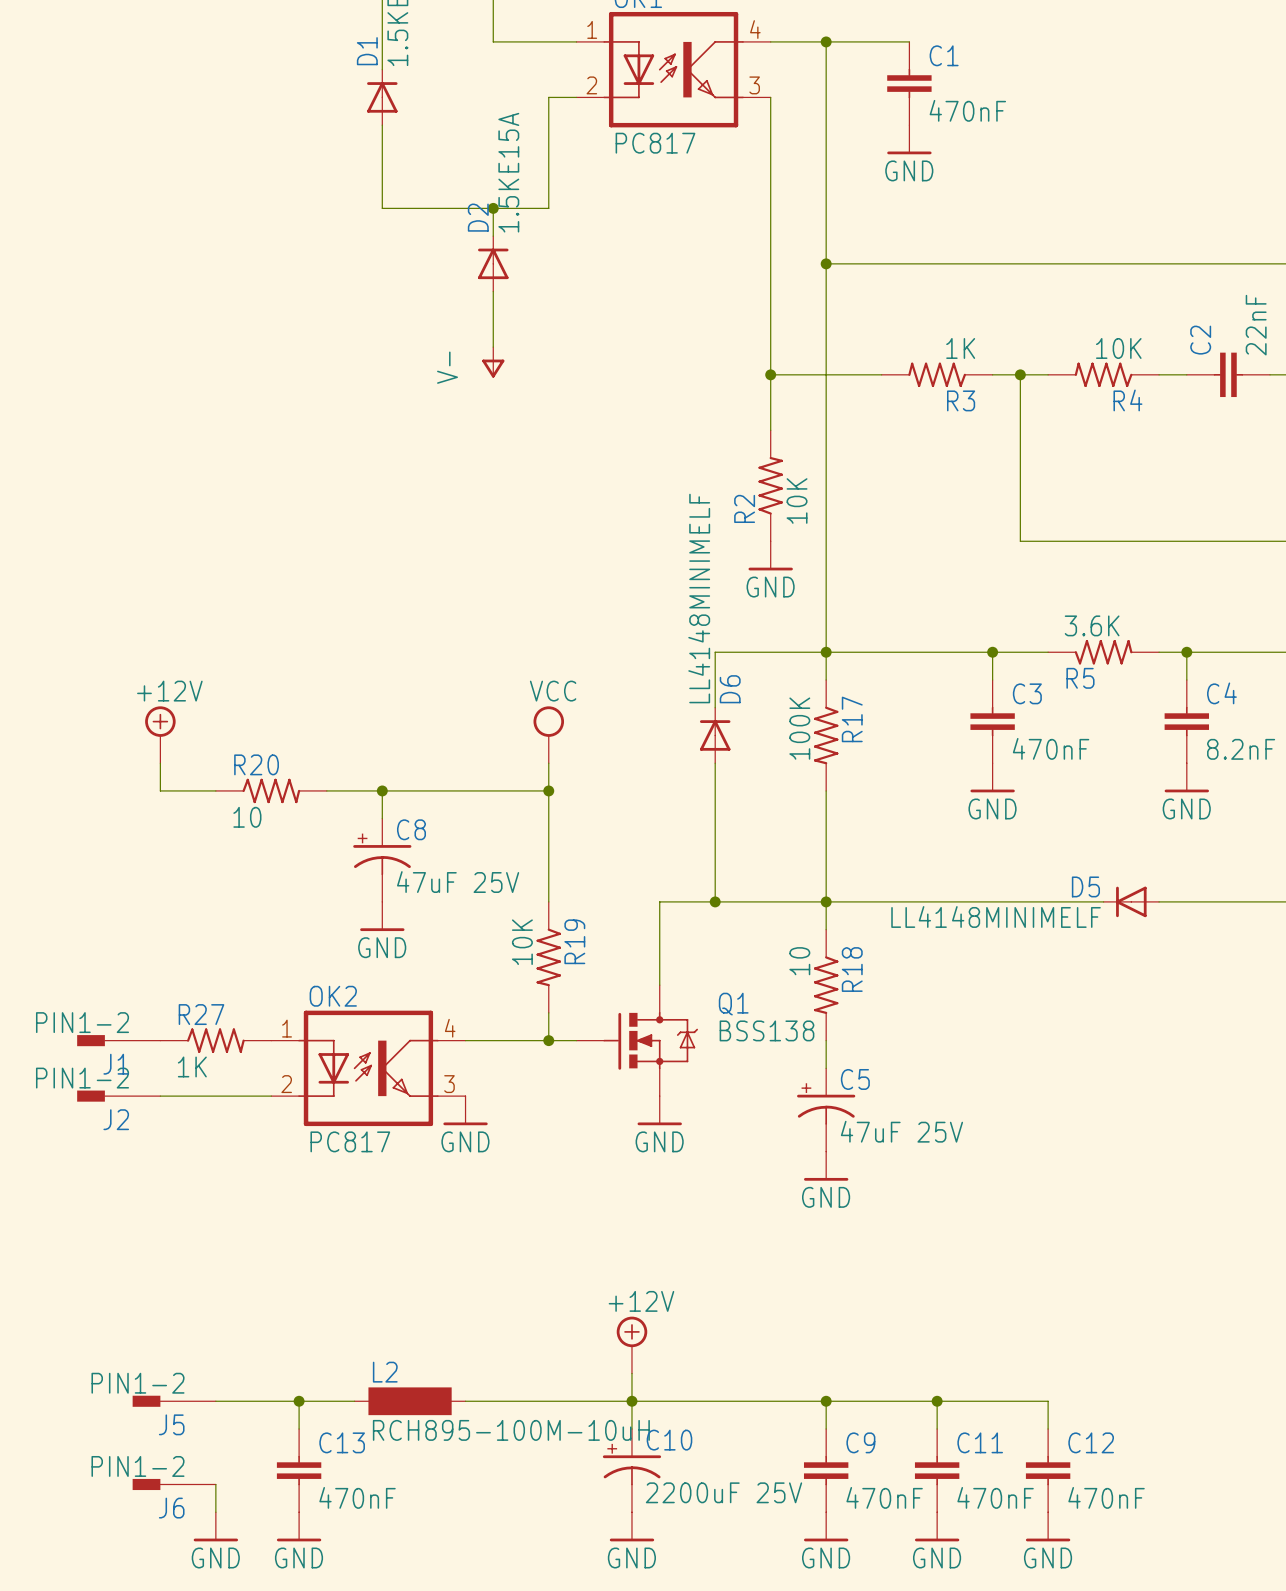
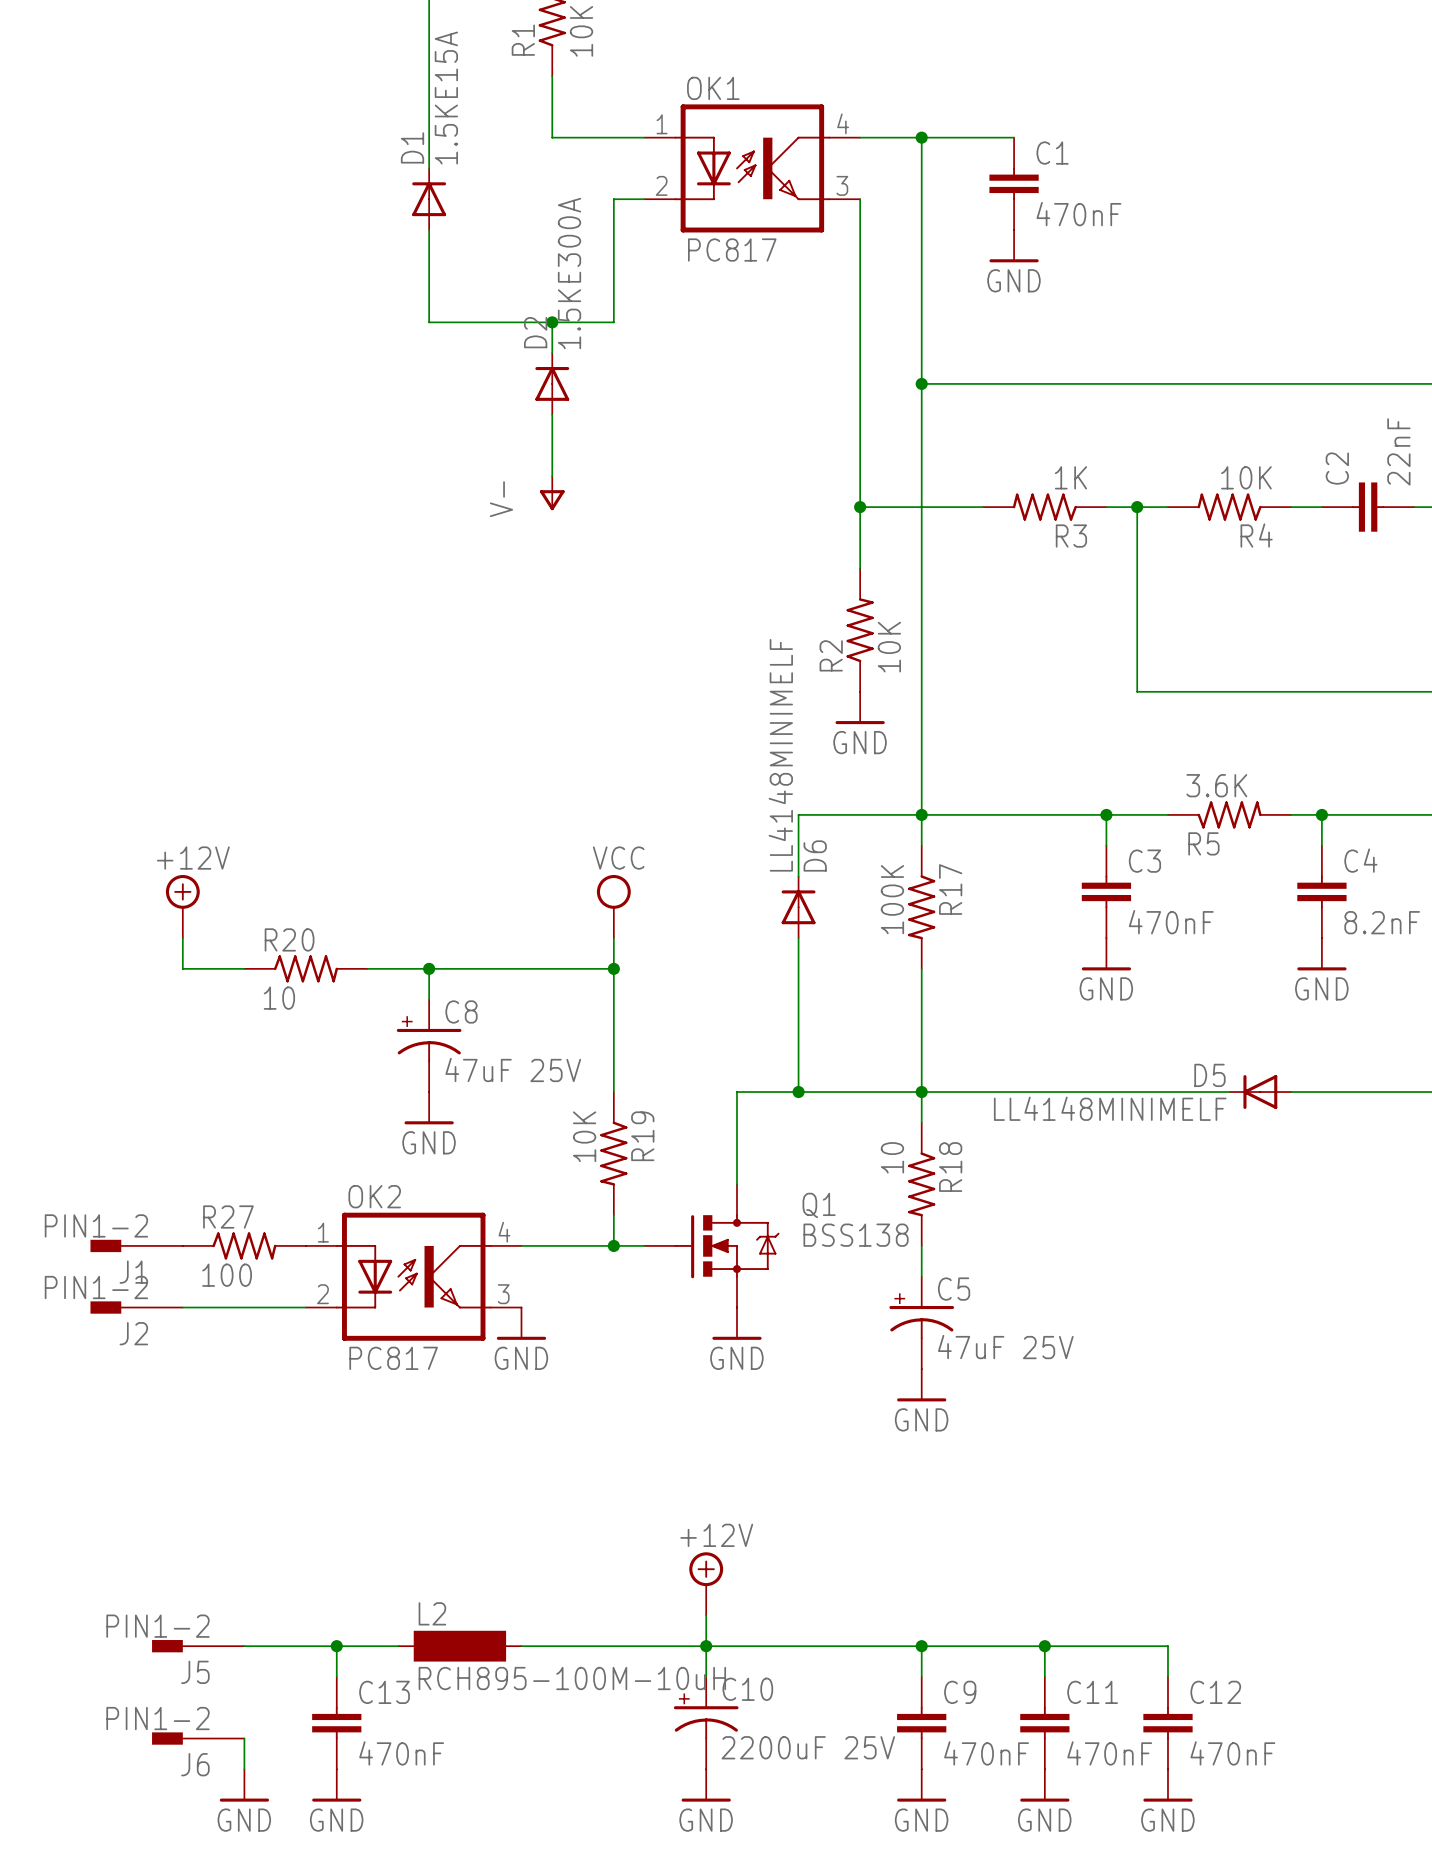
D2 value: 1.5KE15A (508, 172) -> 1.5KE300A (569, 273)
R27 value: 1K (192, 1066) -> 100 (227, 1275)

